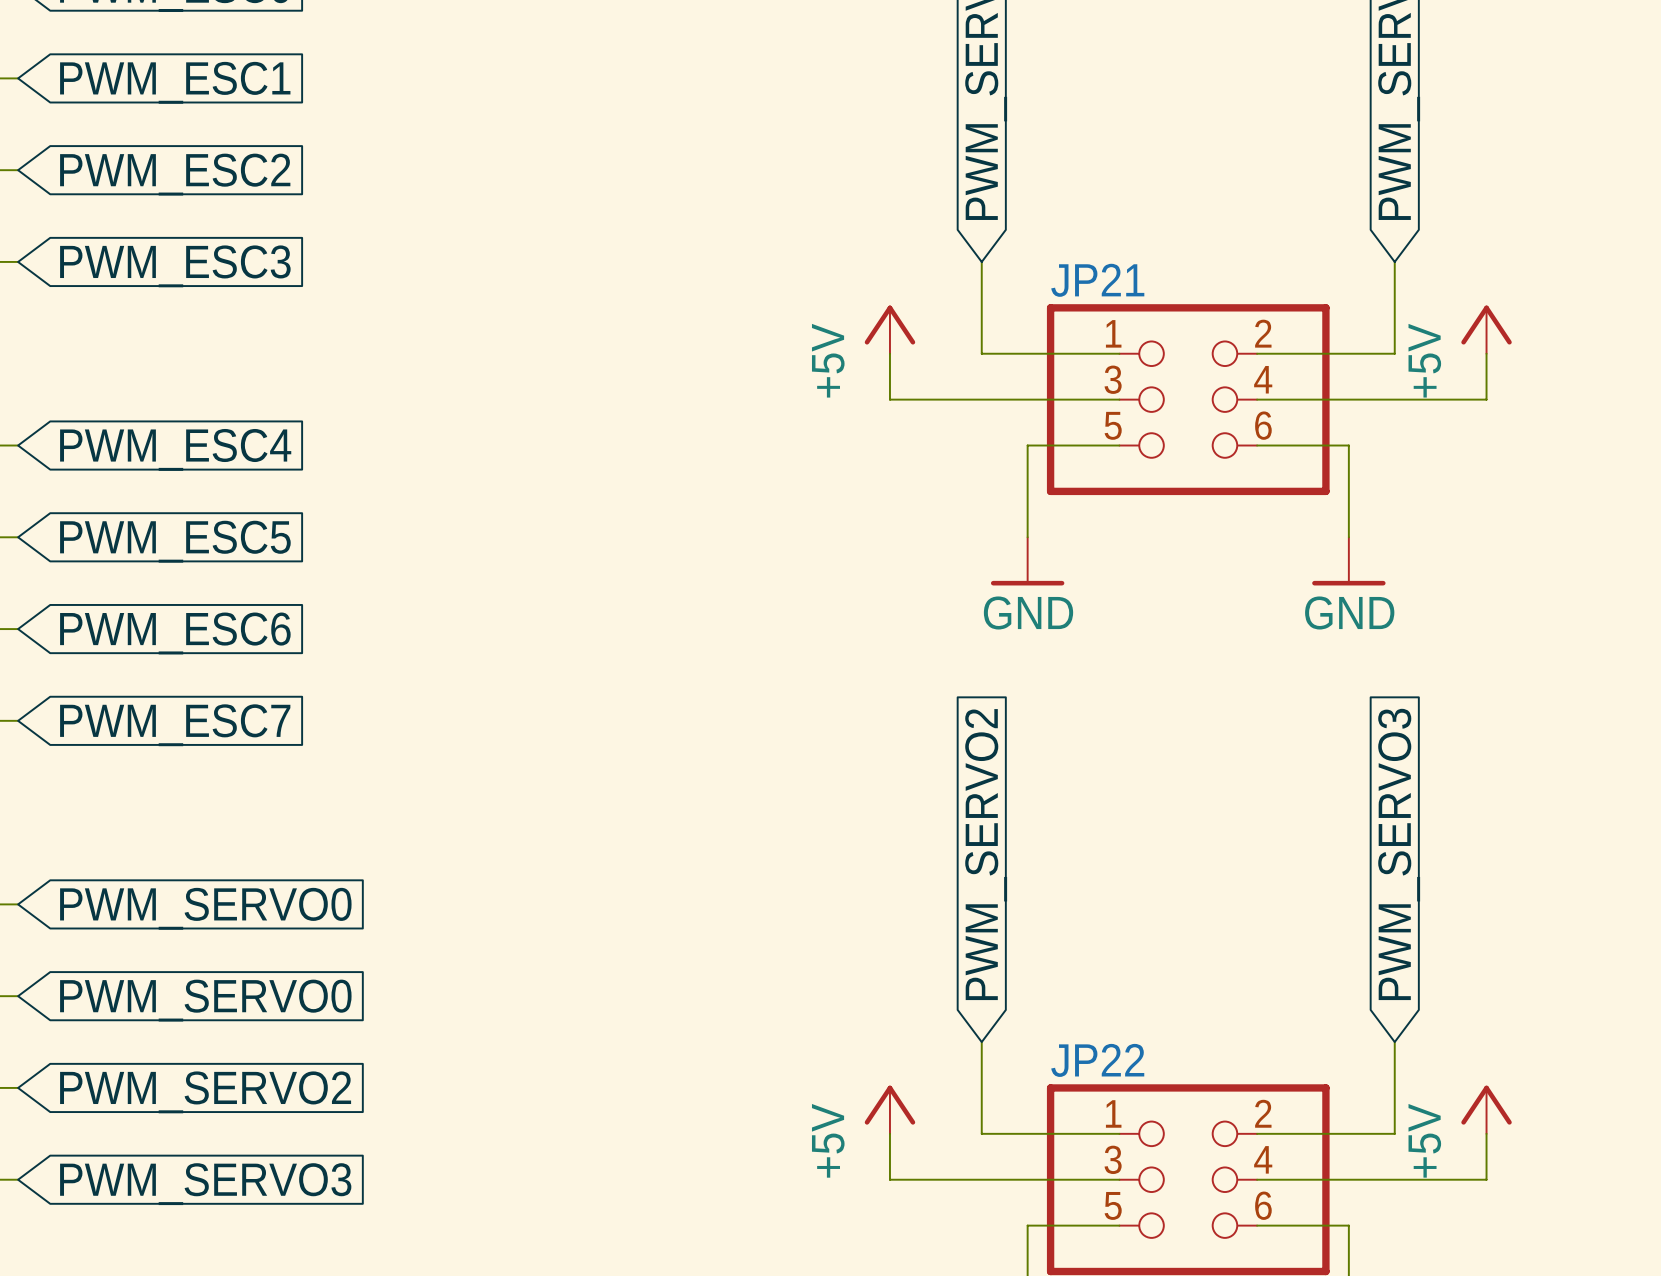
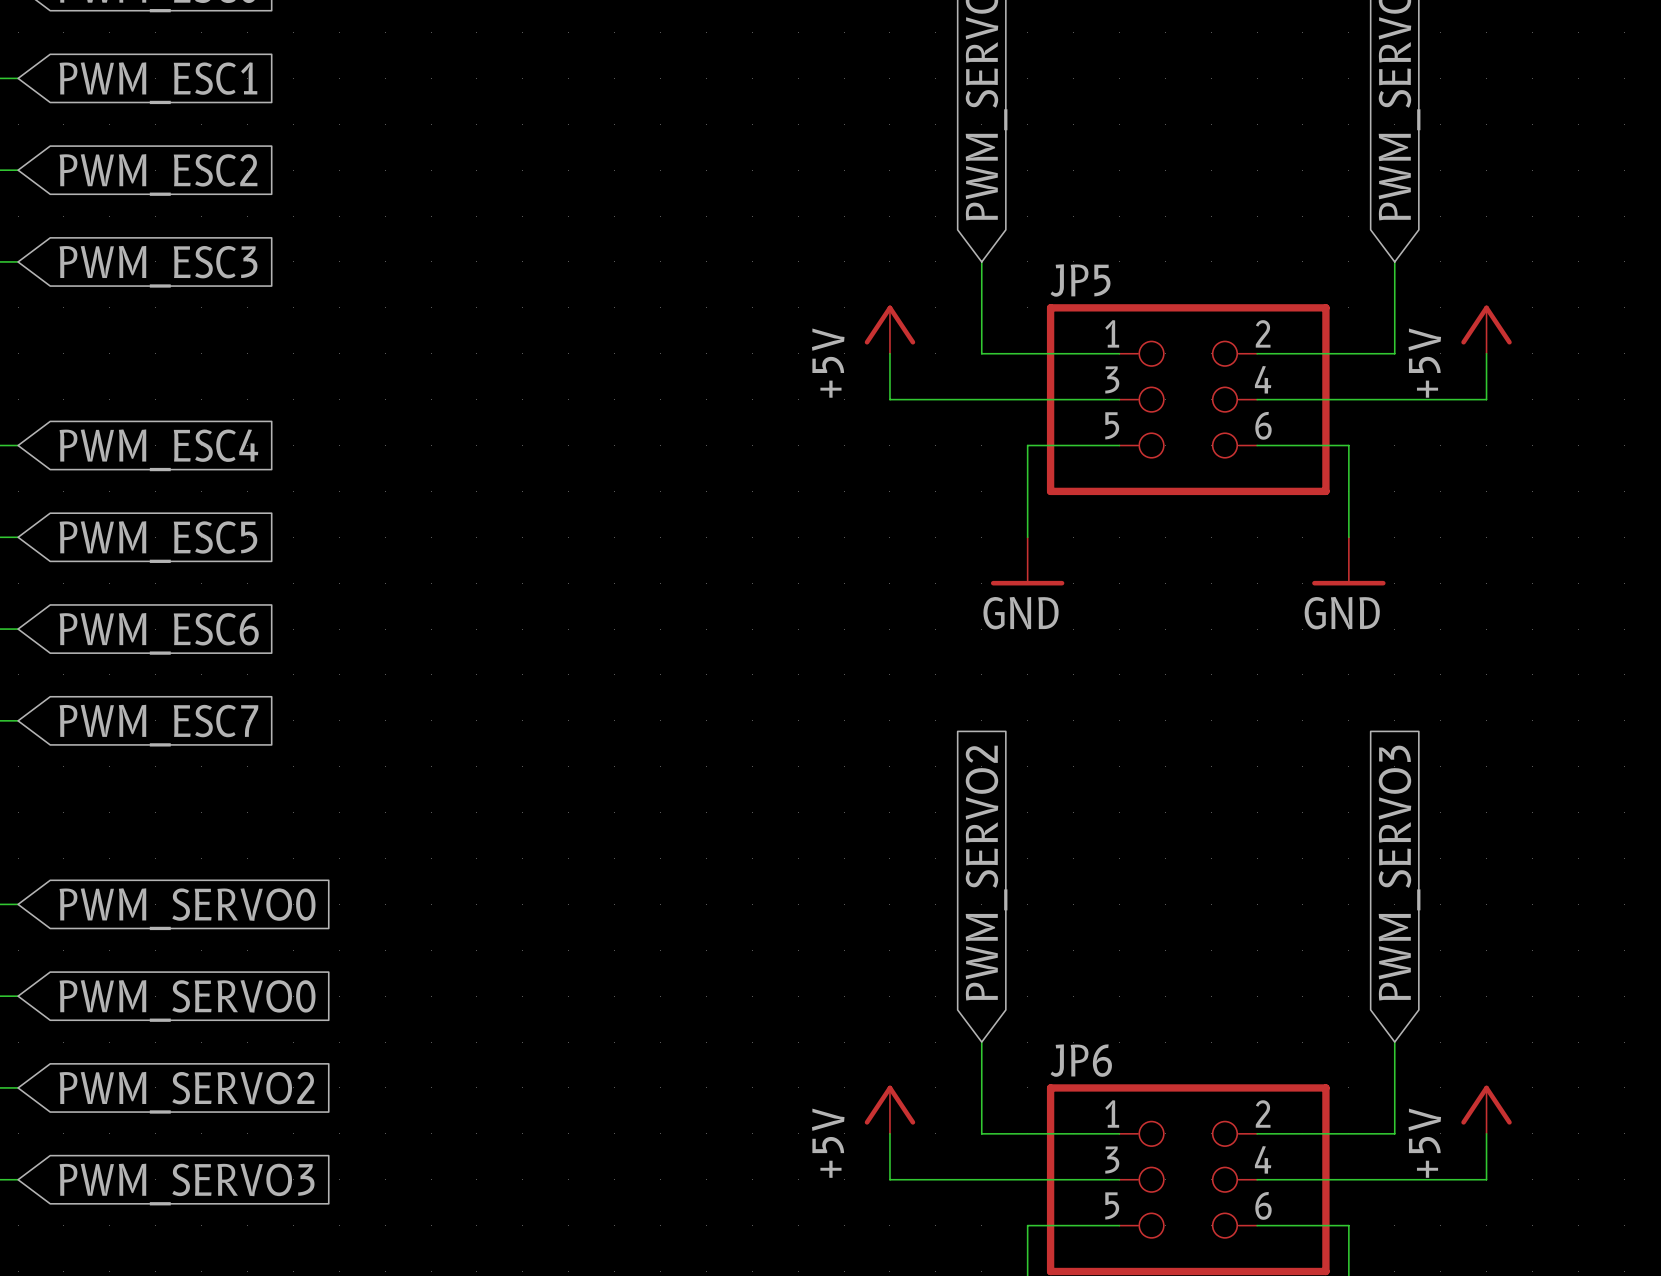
JP21 name: JP21 (1097, 280) -> JP5 (1080, 280)
JP22 name: JP22 (1097, 1060) -> JP6 (1081, 1060)

